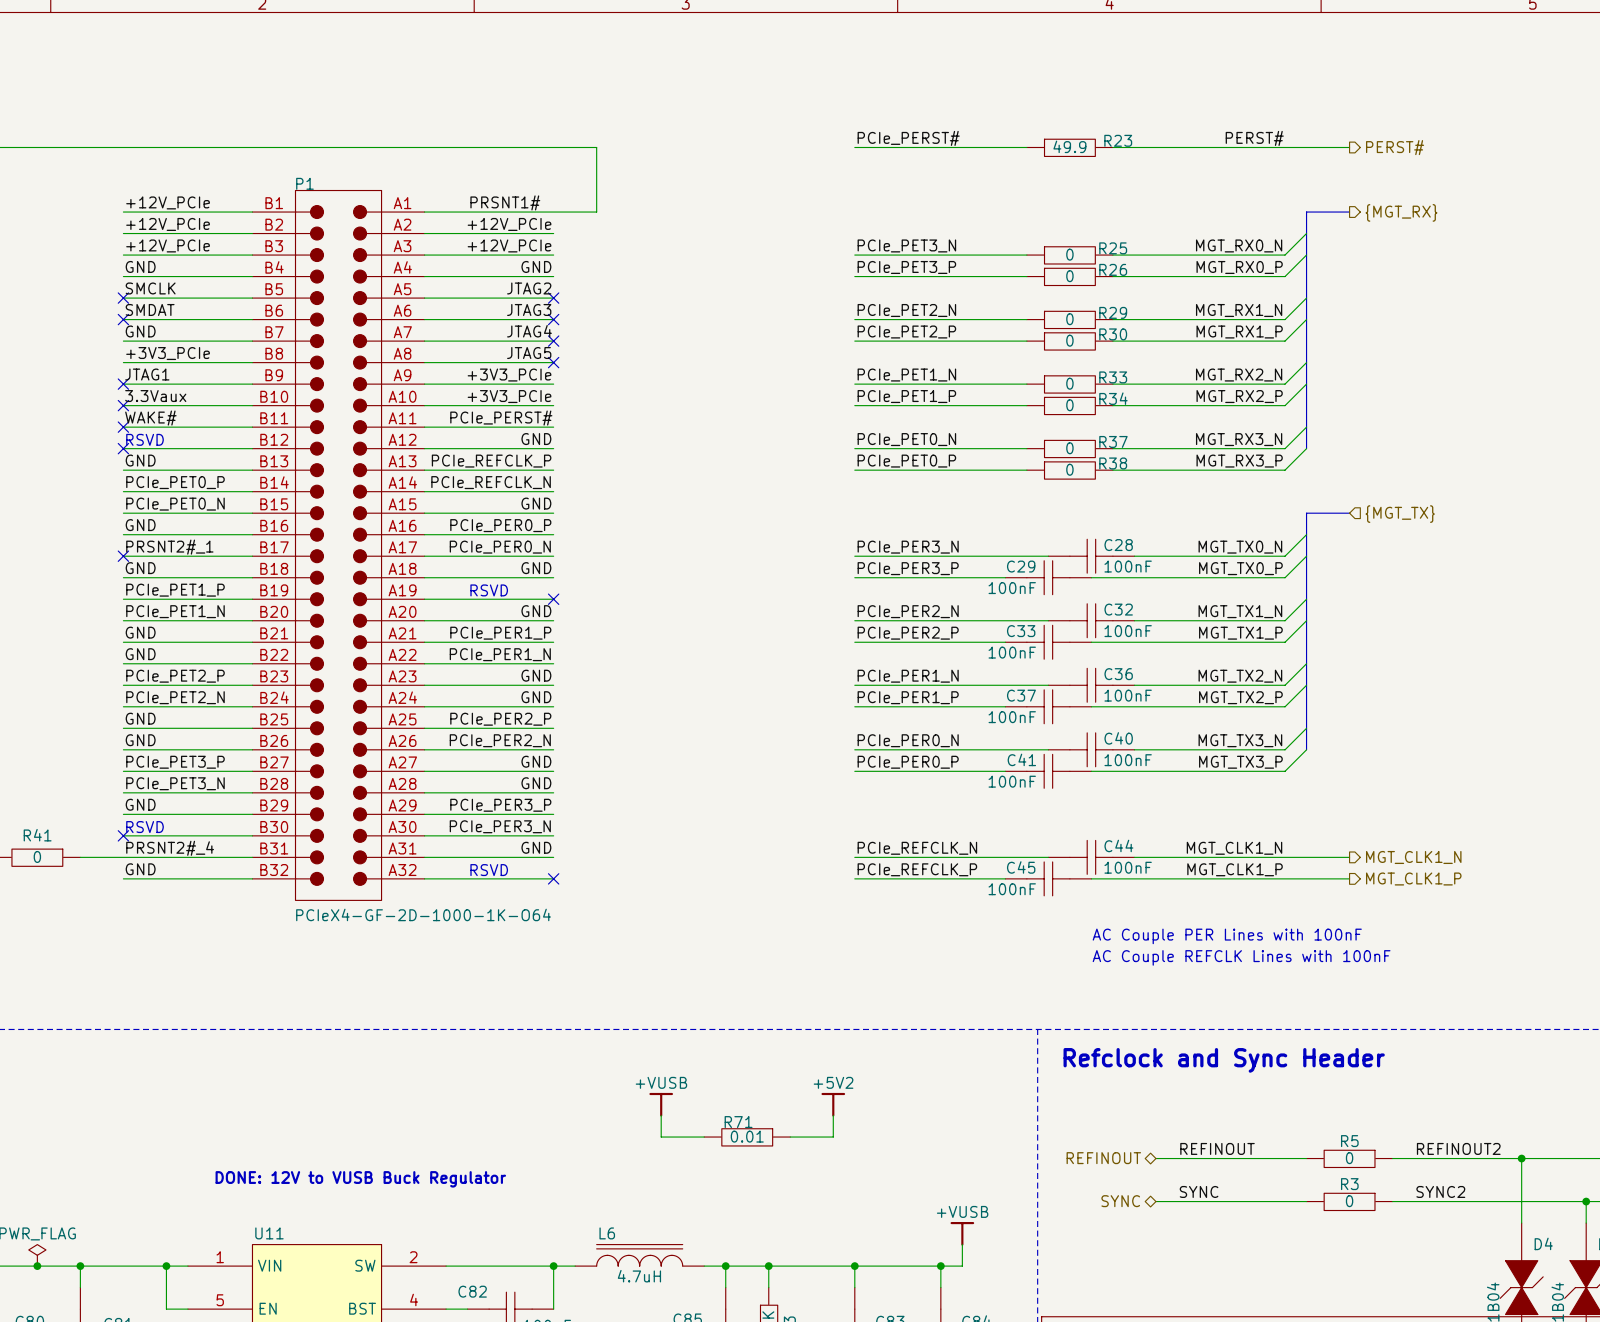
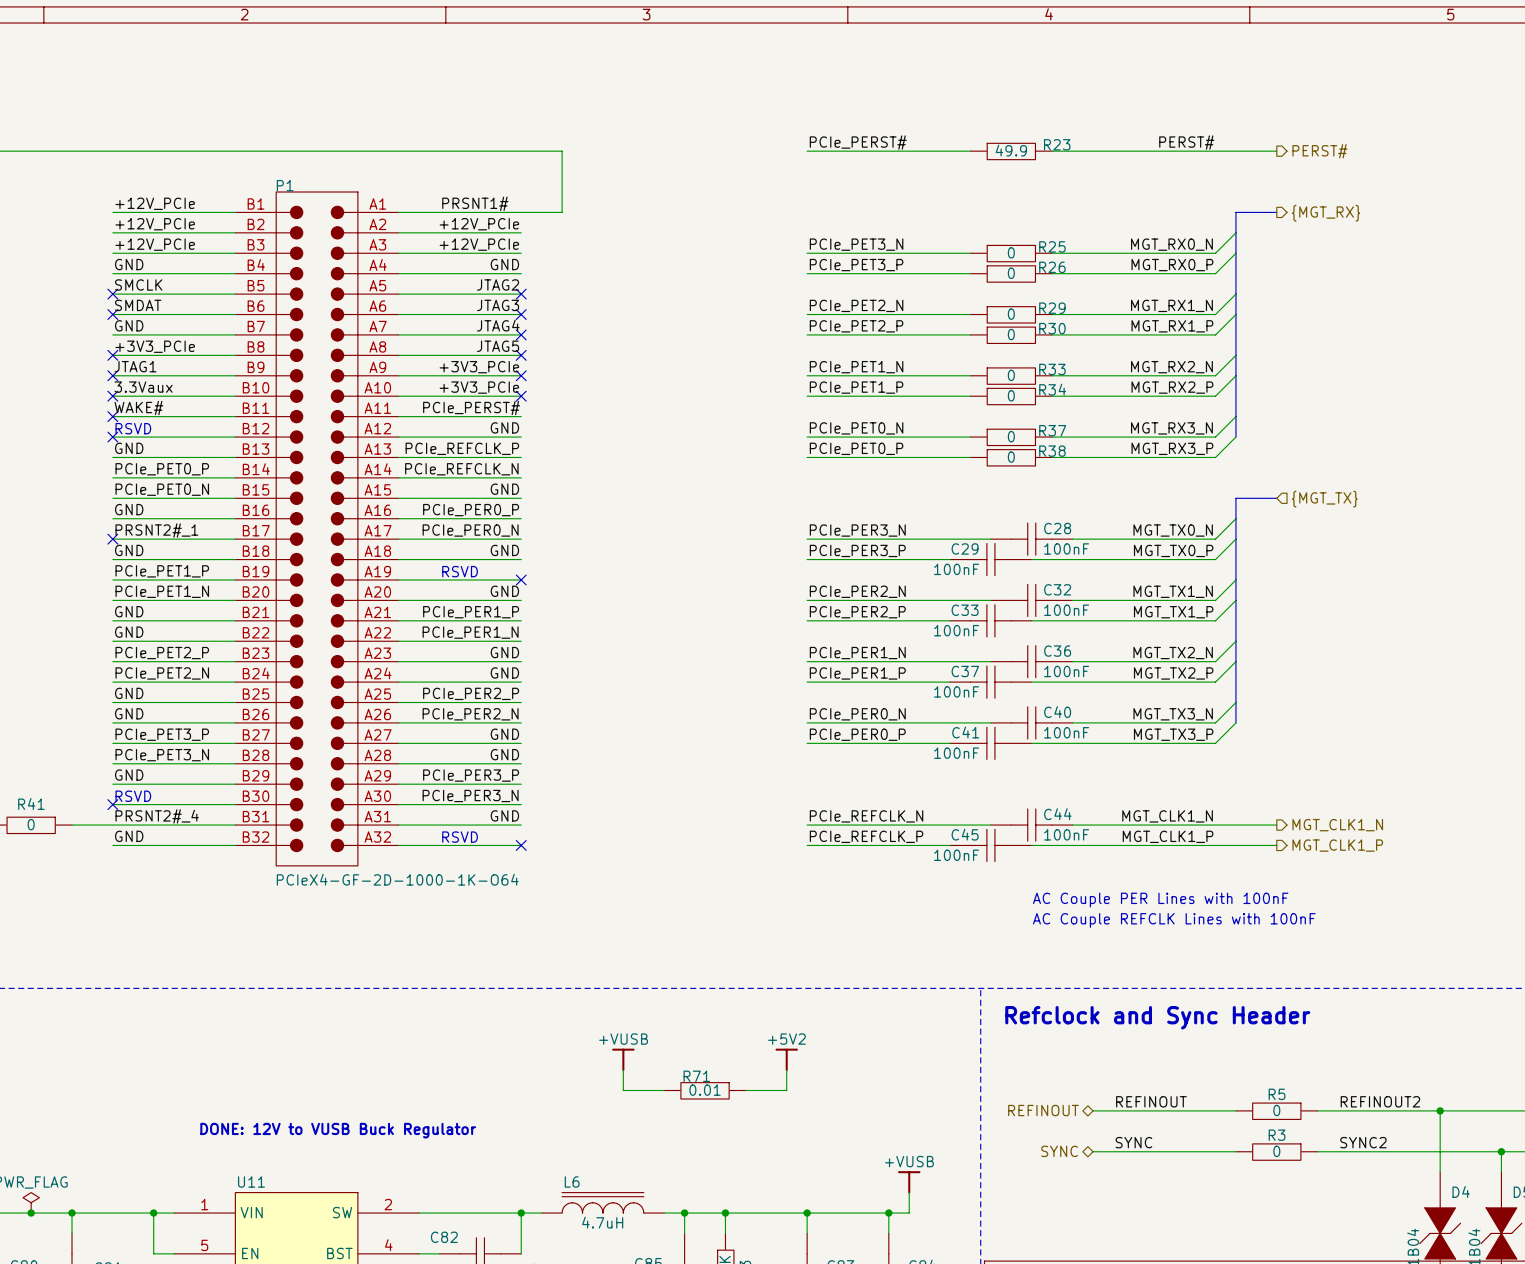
no-connect mark: none -> (112, 355)
no-connect mark: none -> (521, 375)
no-connect mark: none -> (521, 396)

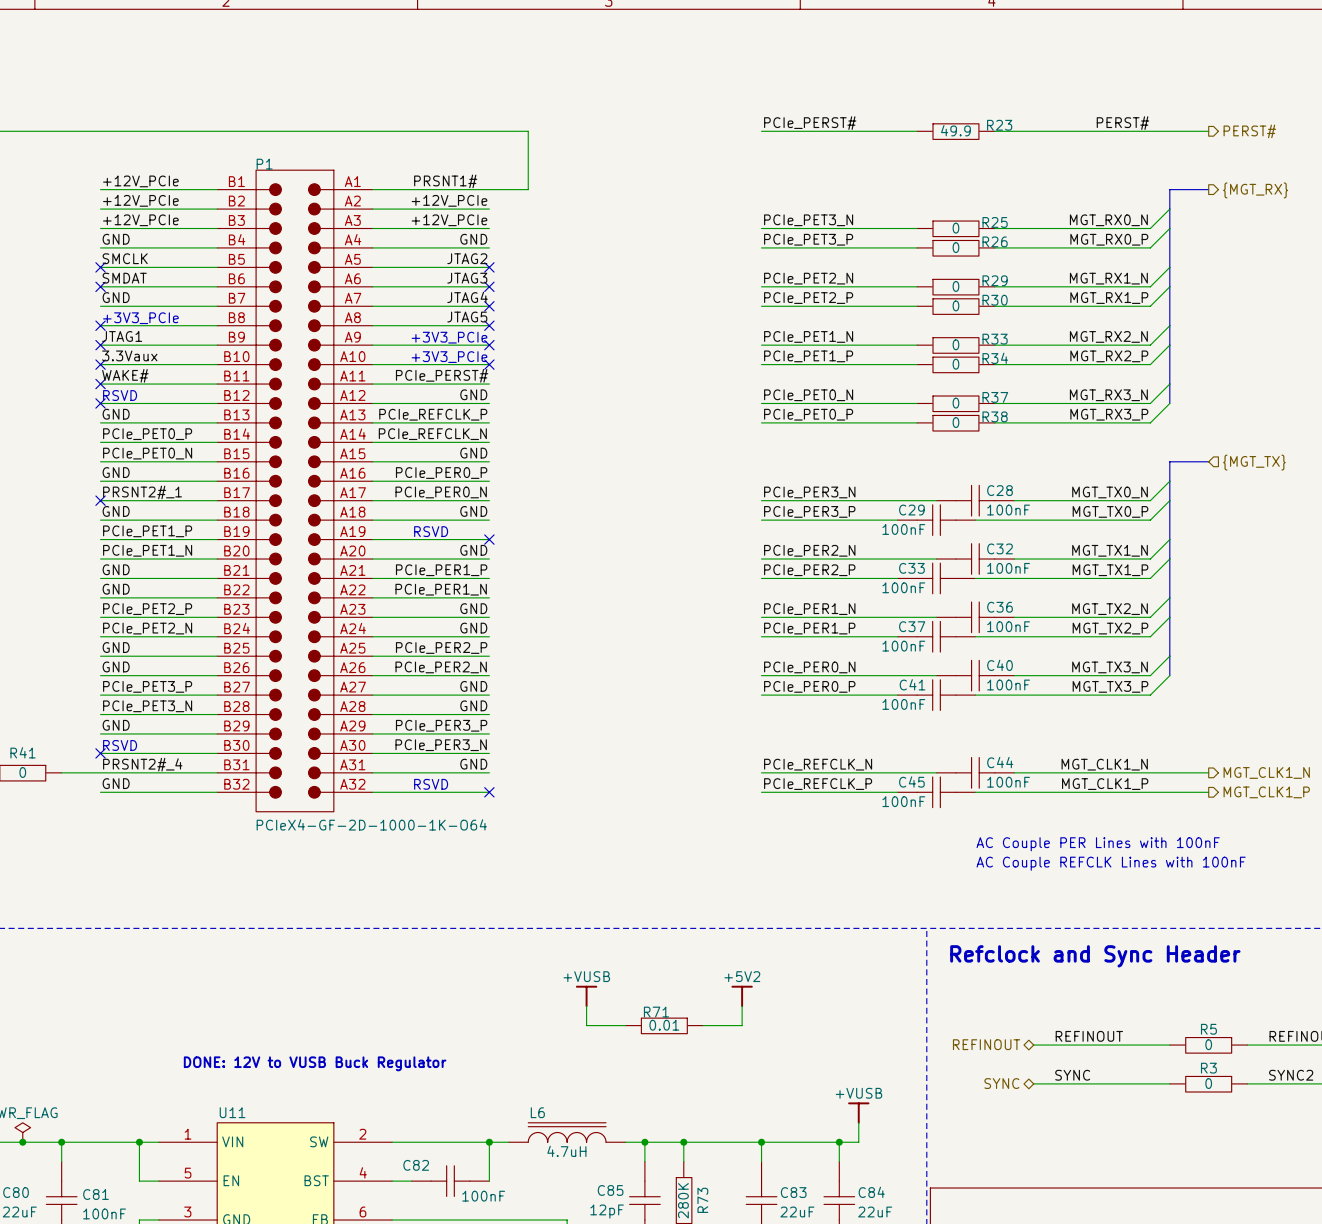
label: +3V3_PCIe (155, 346) -> none
text: none -> +3V3_PCIe (140, 318)
label: +3V3_PCIe (479, 367) -> none
text: none -> +3V3_PCIe (449, 337)
label: +3V3_PCIe (479, 387) -> none
text: none -> +3V3_PCIe (449, 357)

